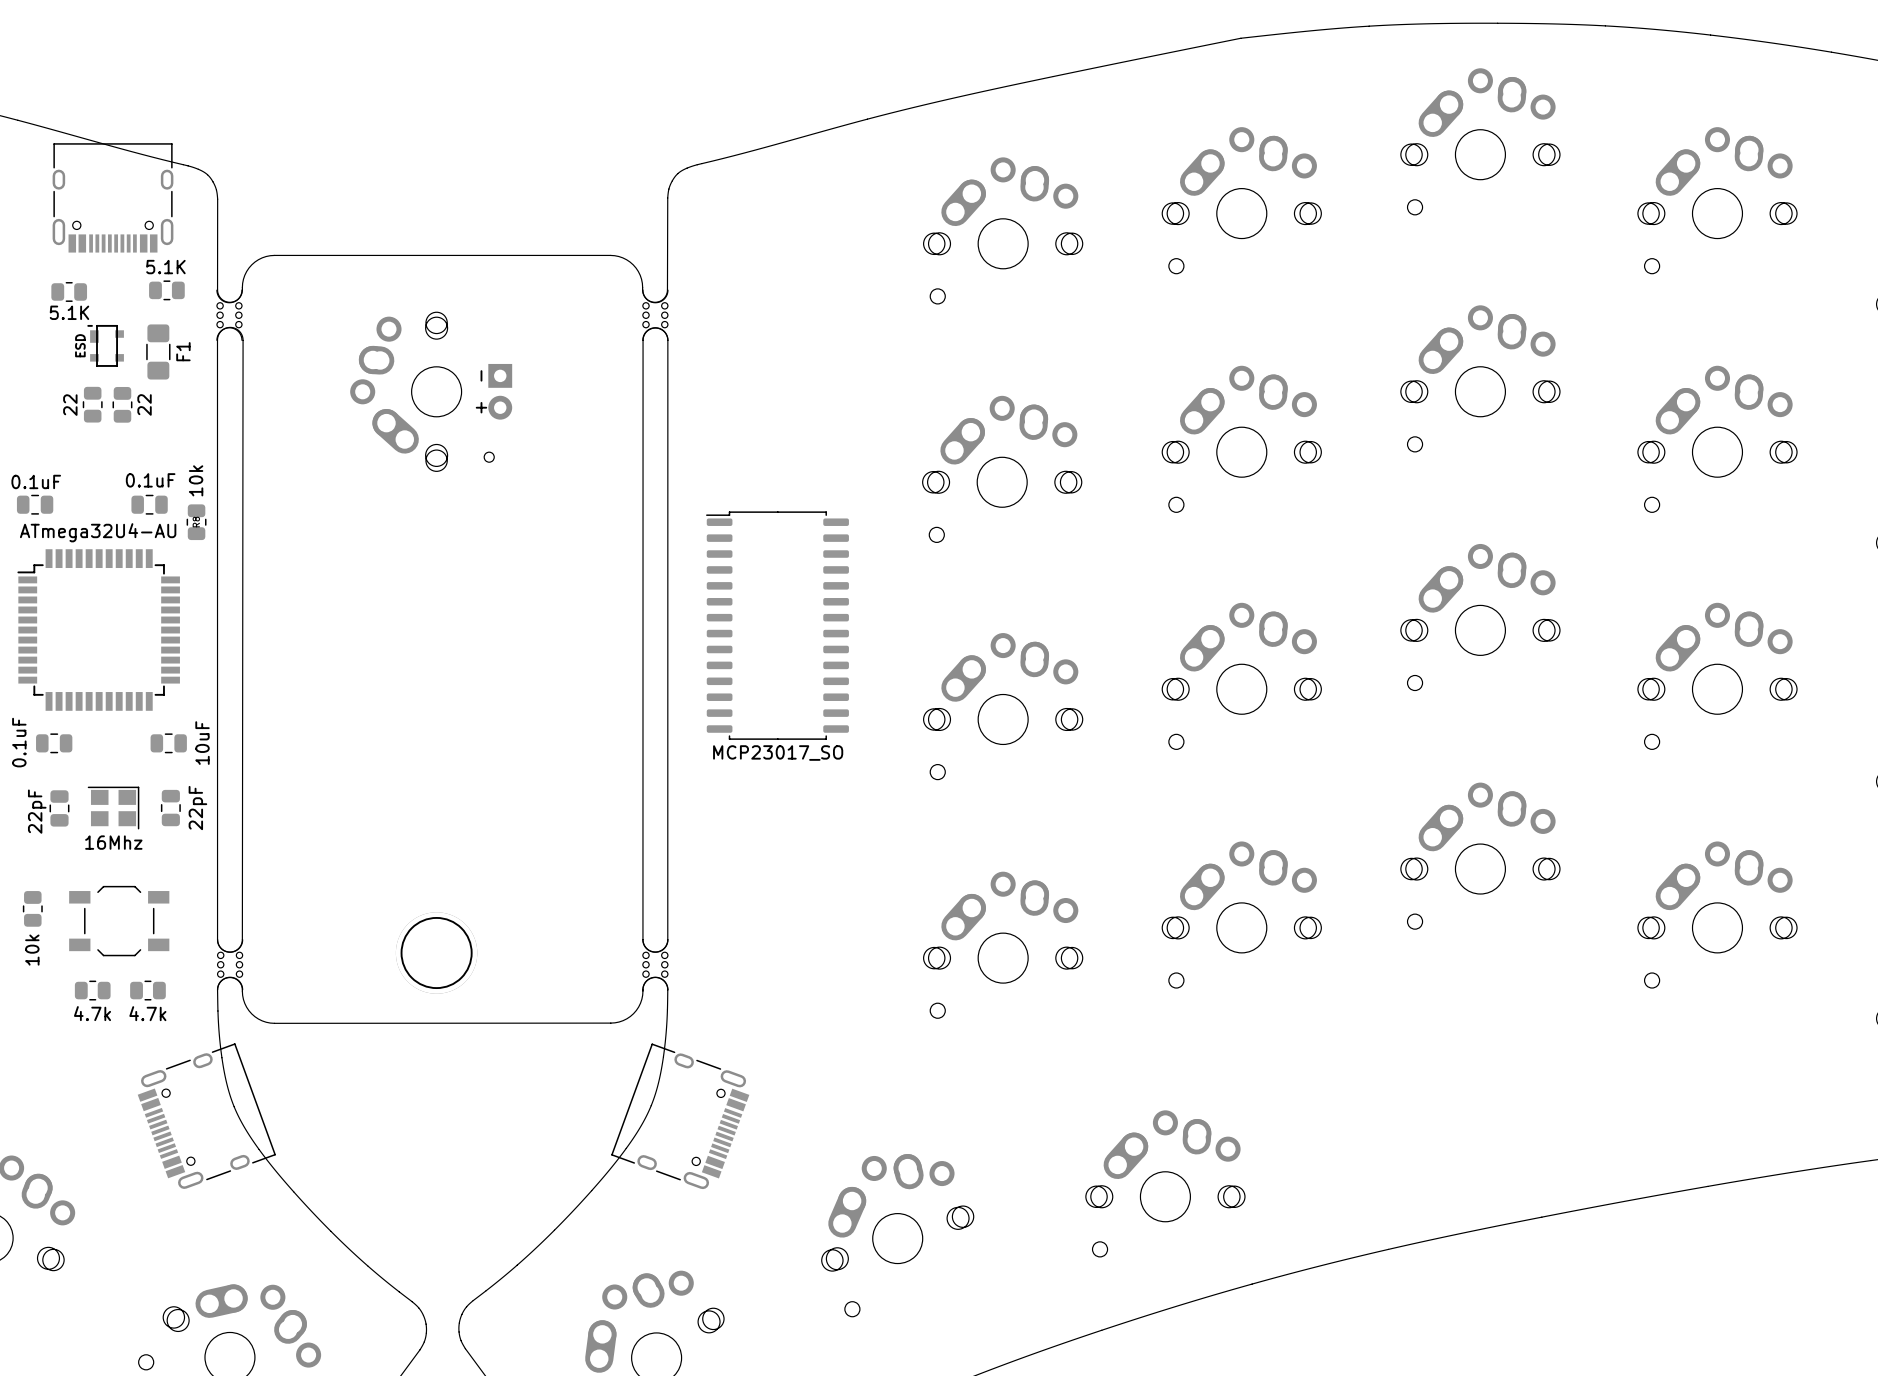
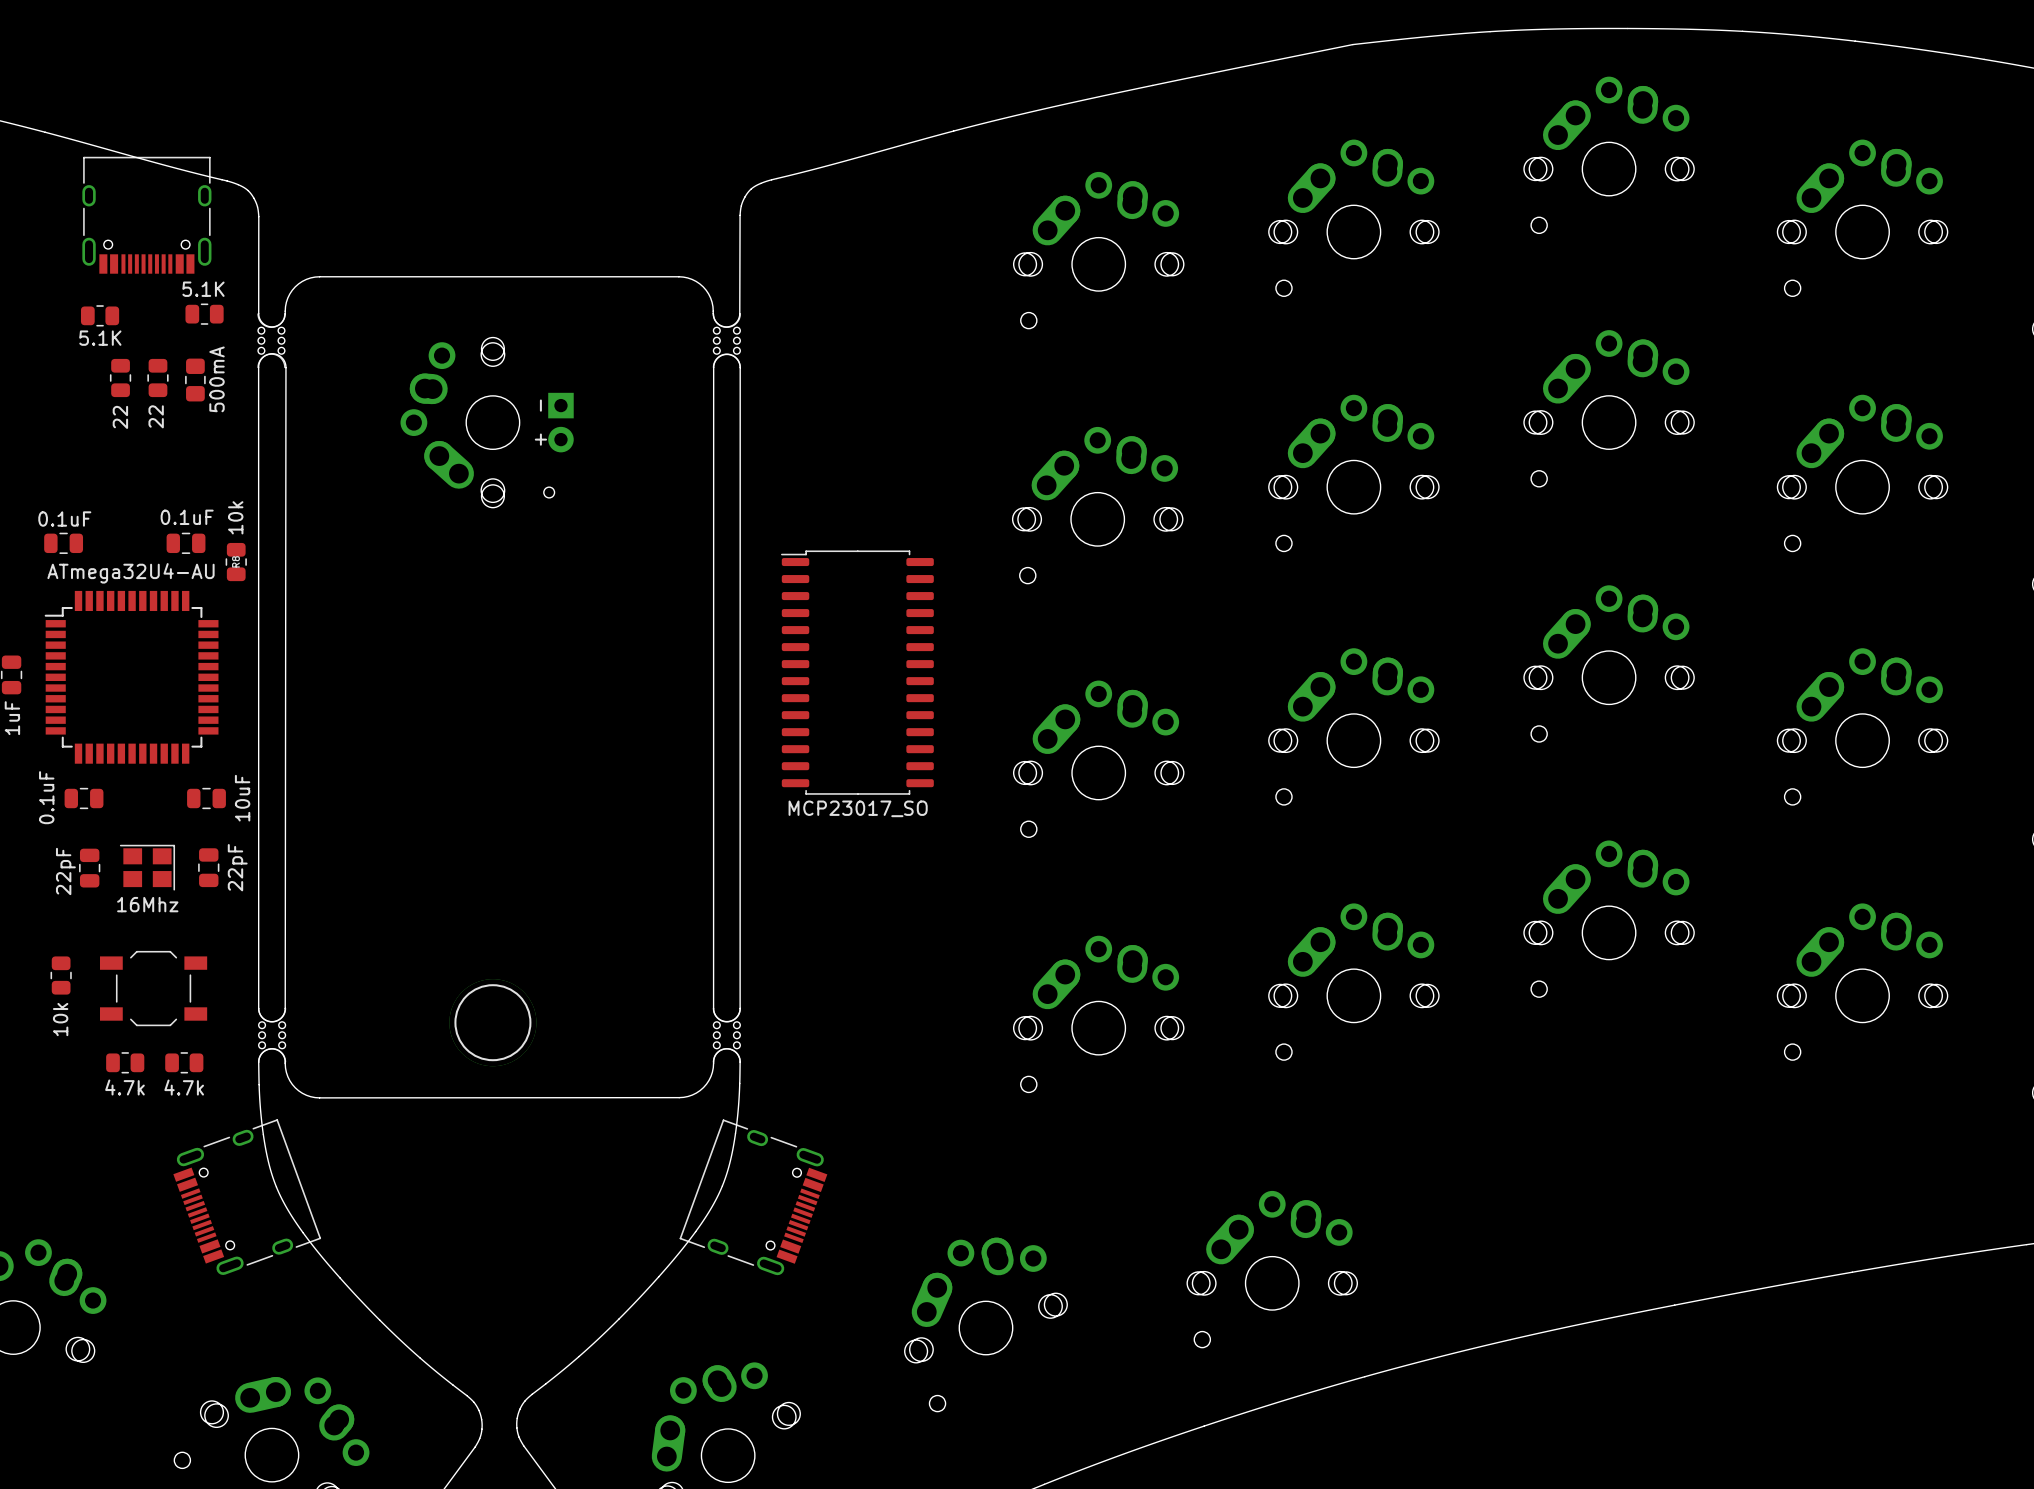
part: (105, 345) -> none
part: none -> 22 (120, 378)
part: none -> 22 (157, 378)
F1: (158, 351) -> none
part: none -> 500mA (195, 380)
part: 22 (92, 404) -> none
part: 22 (122, 404) -> none

